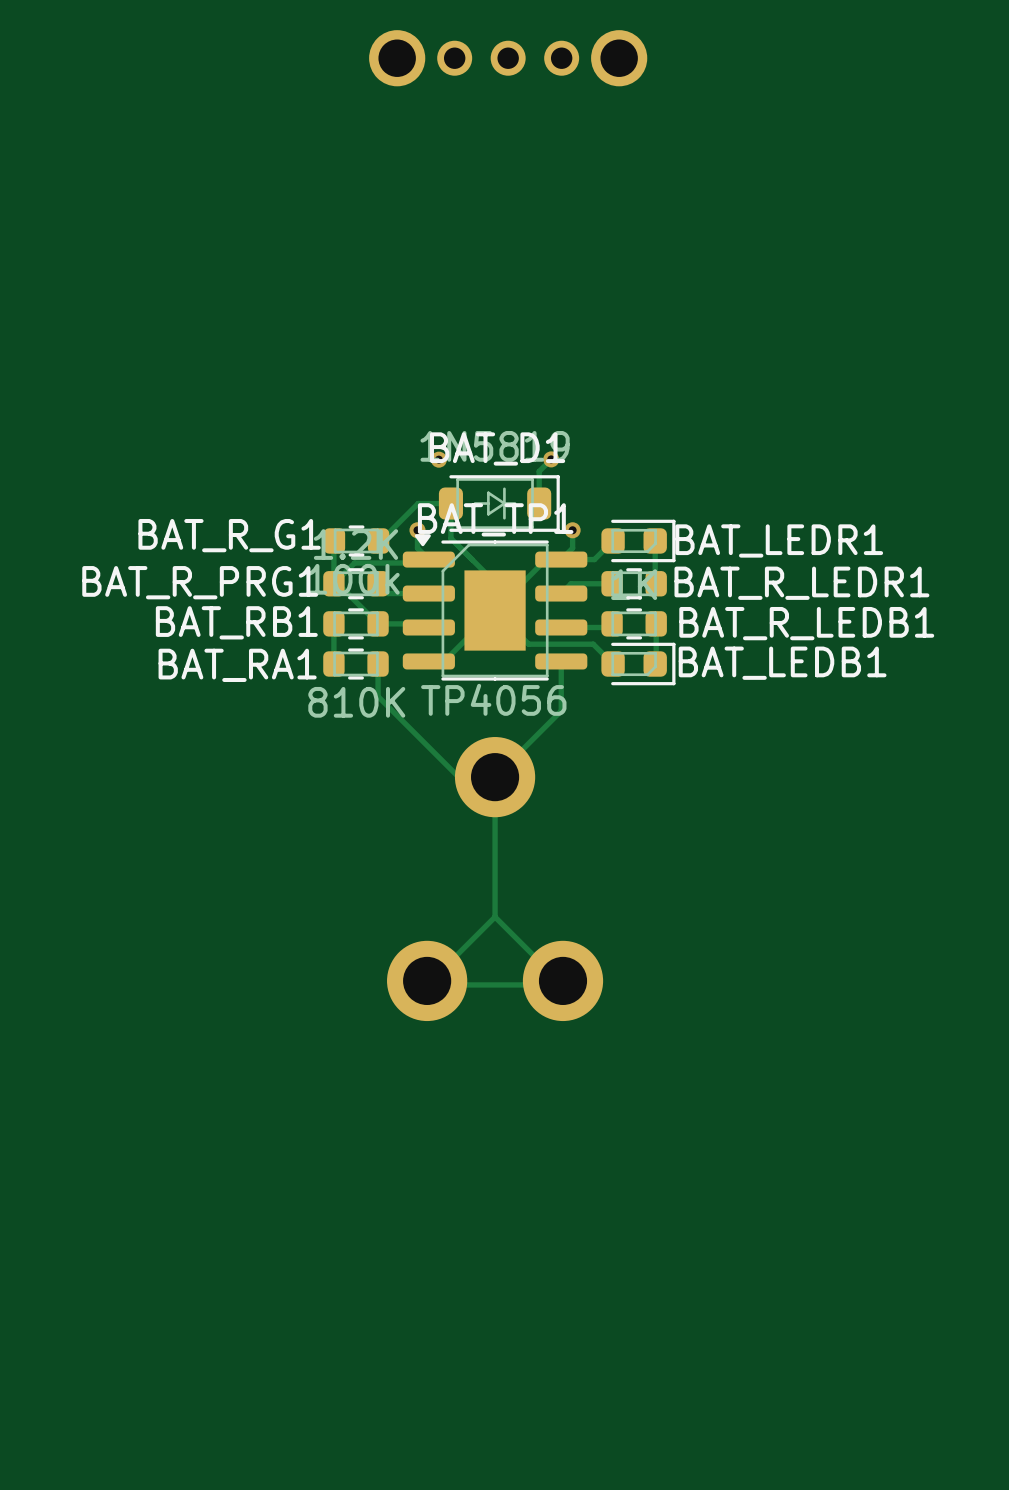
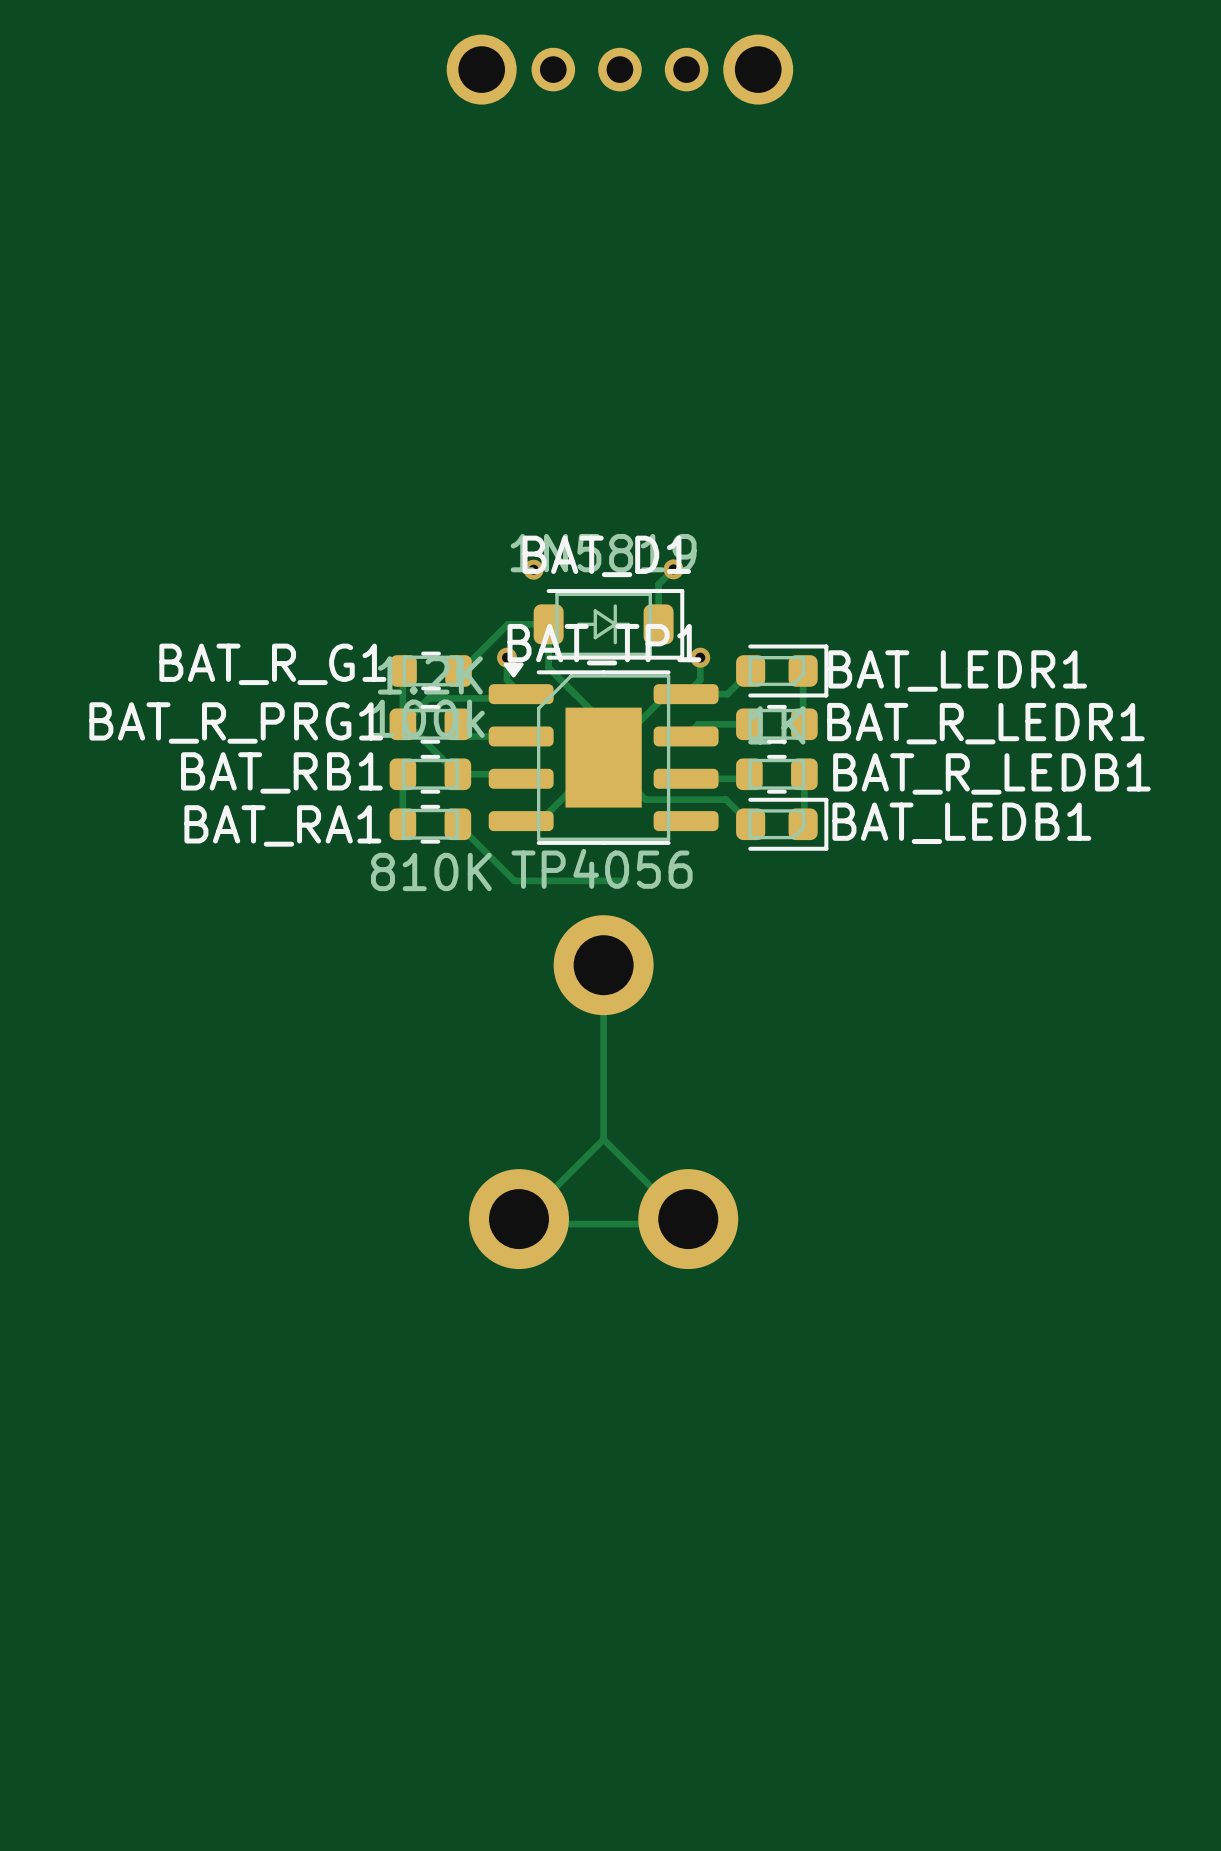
track: (561, 661) (561, 710) (495, 777) (458, 777) (378, 696) (378, 664) -> (626, 880) (514, 880) (457, 824)

